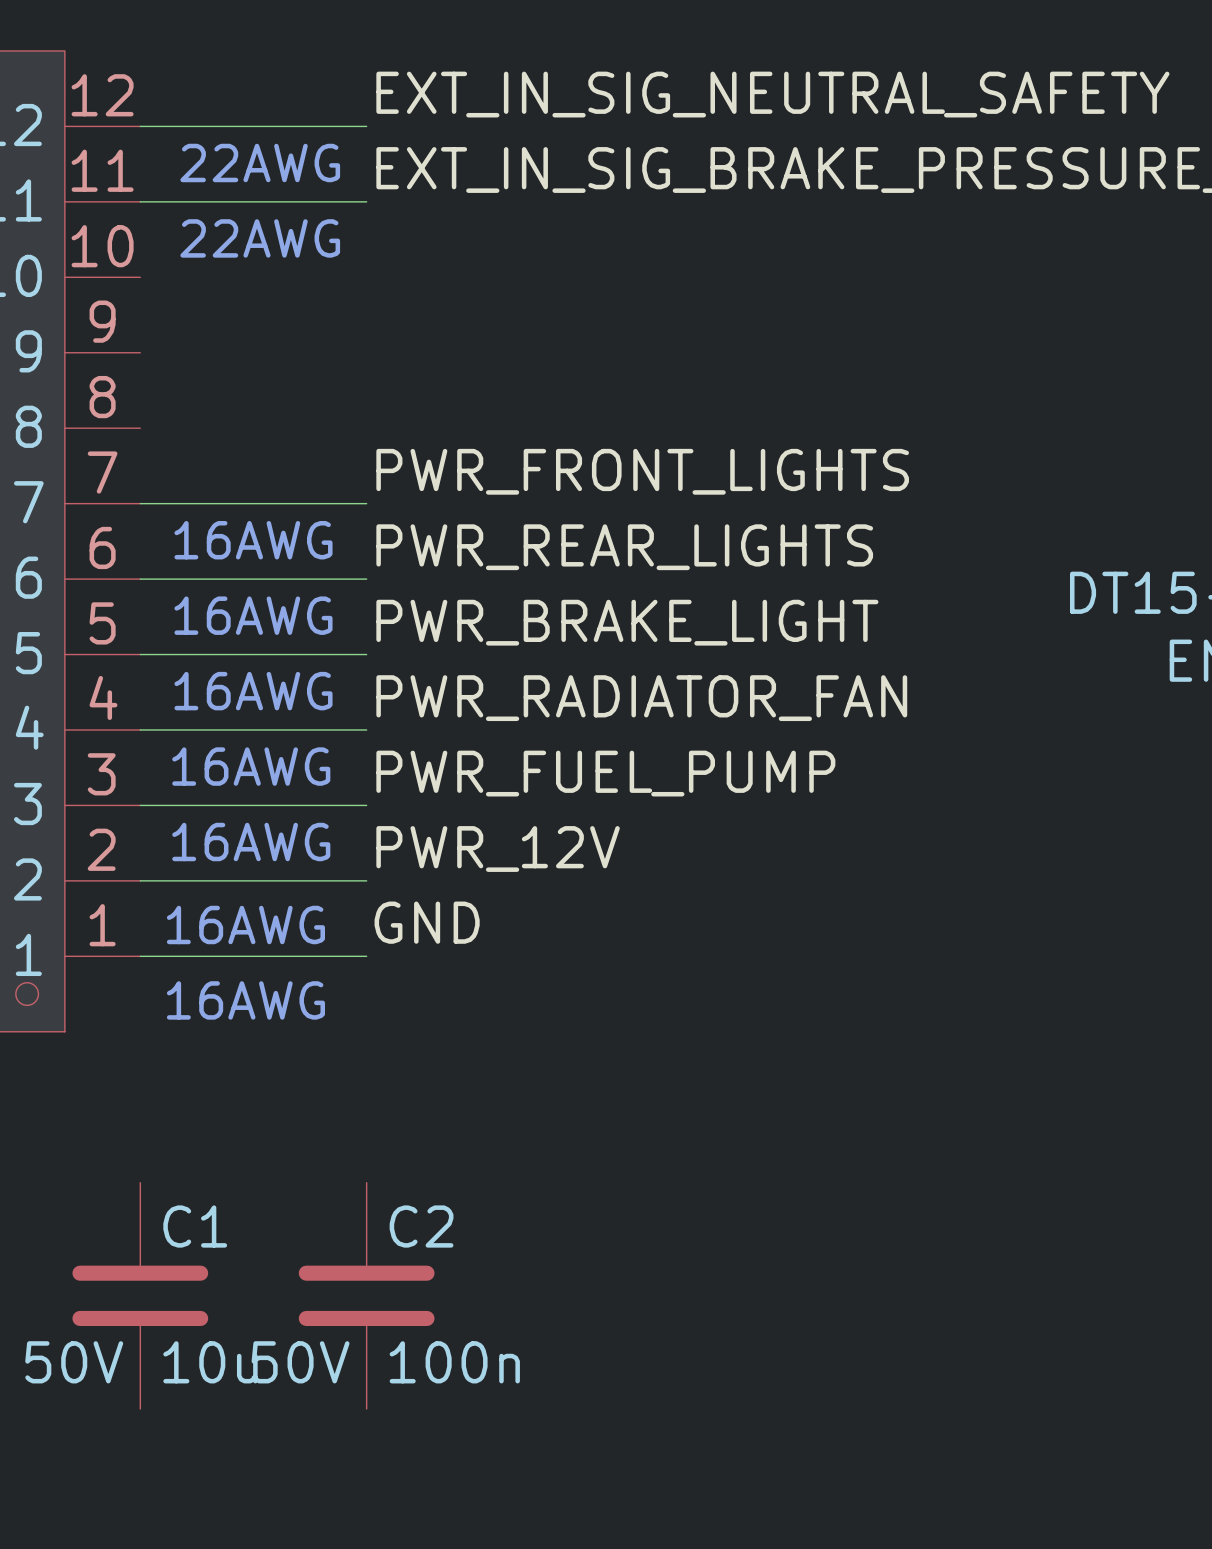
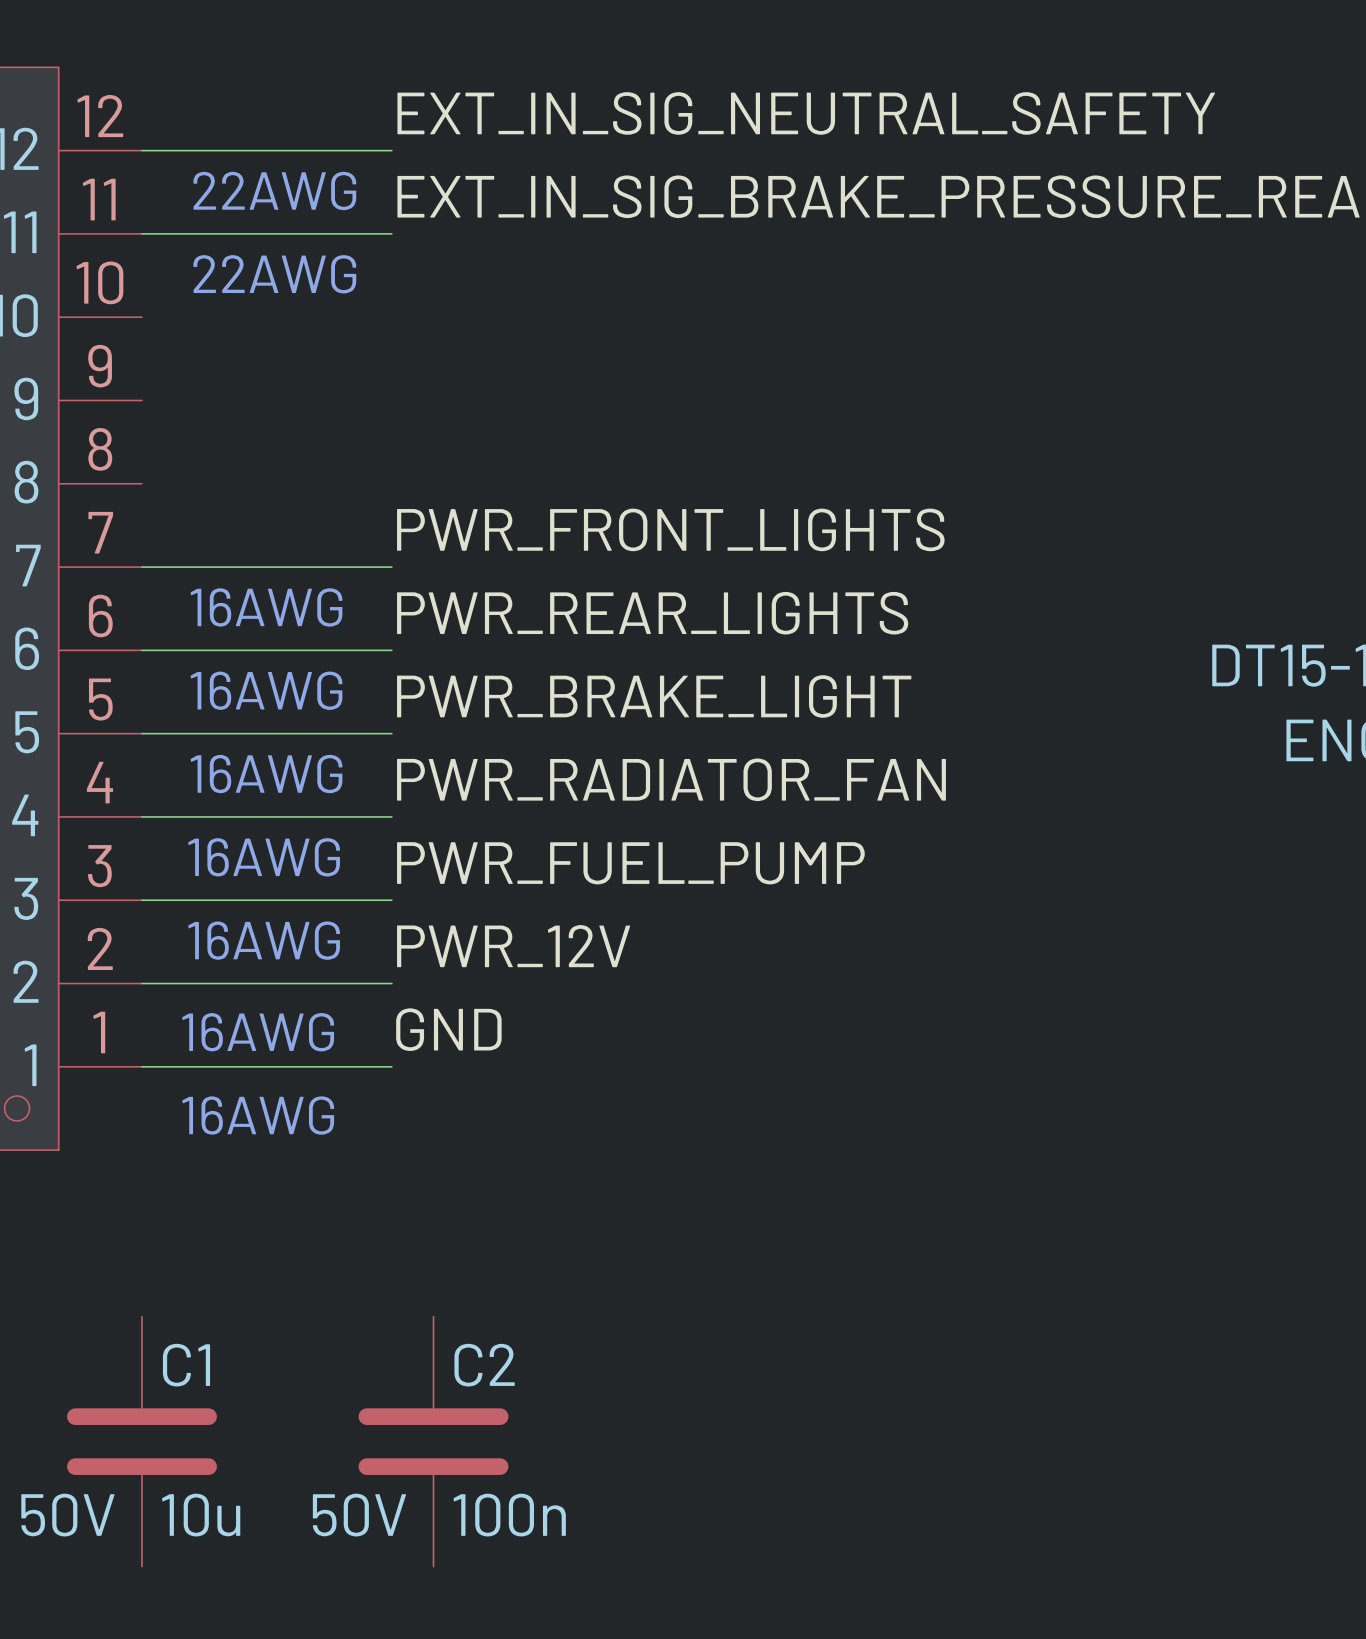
C2 position: (366, 1295) -> (433, 1441)

